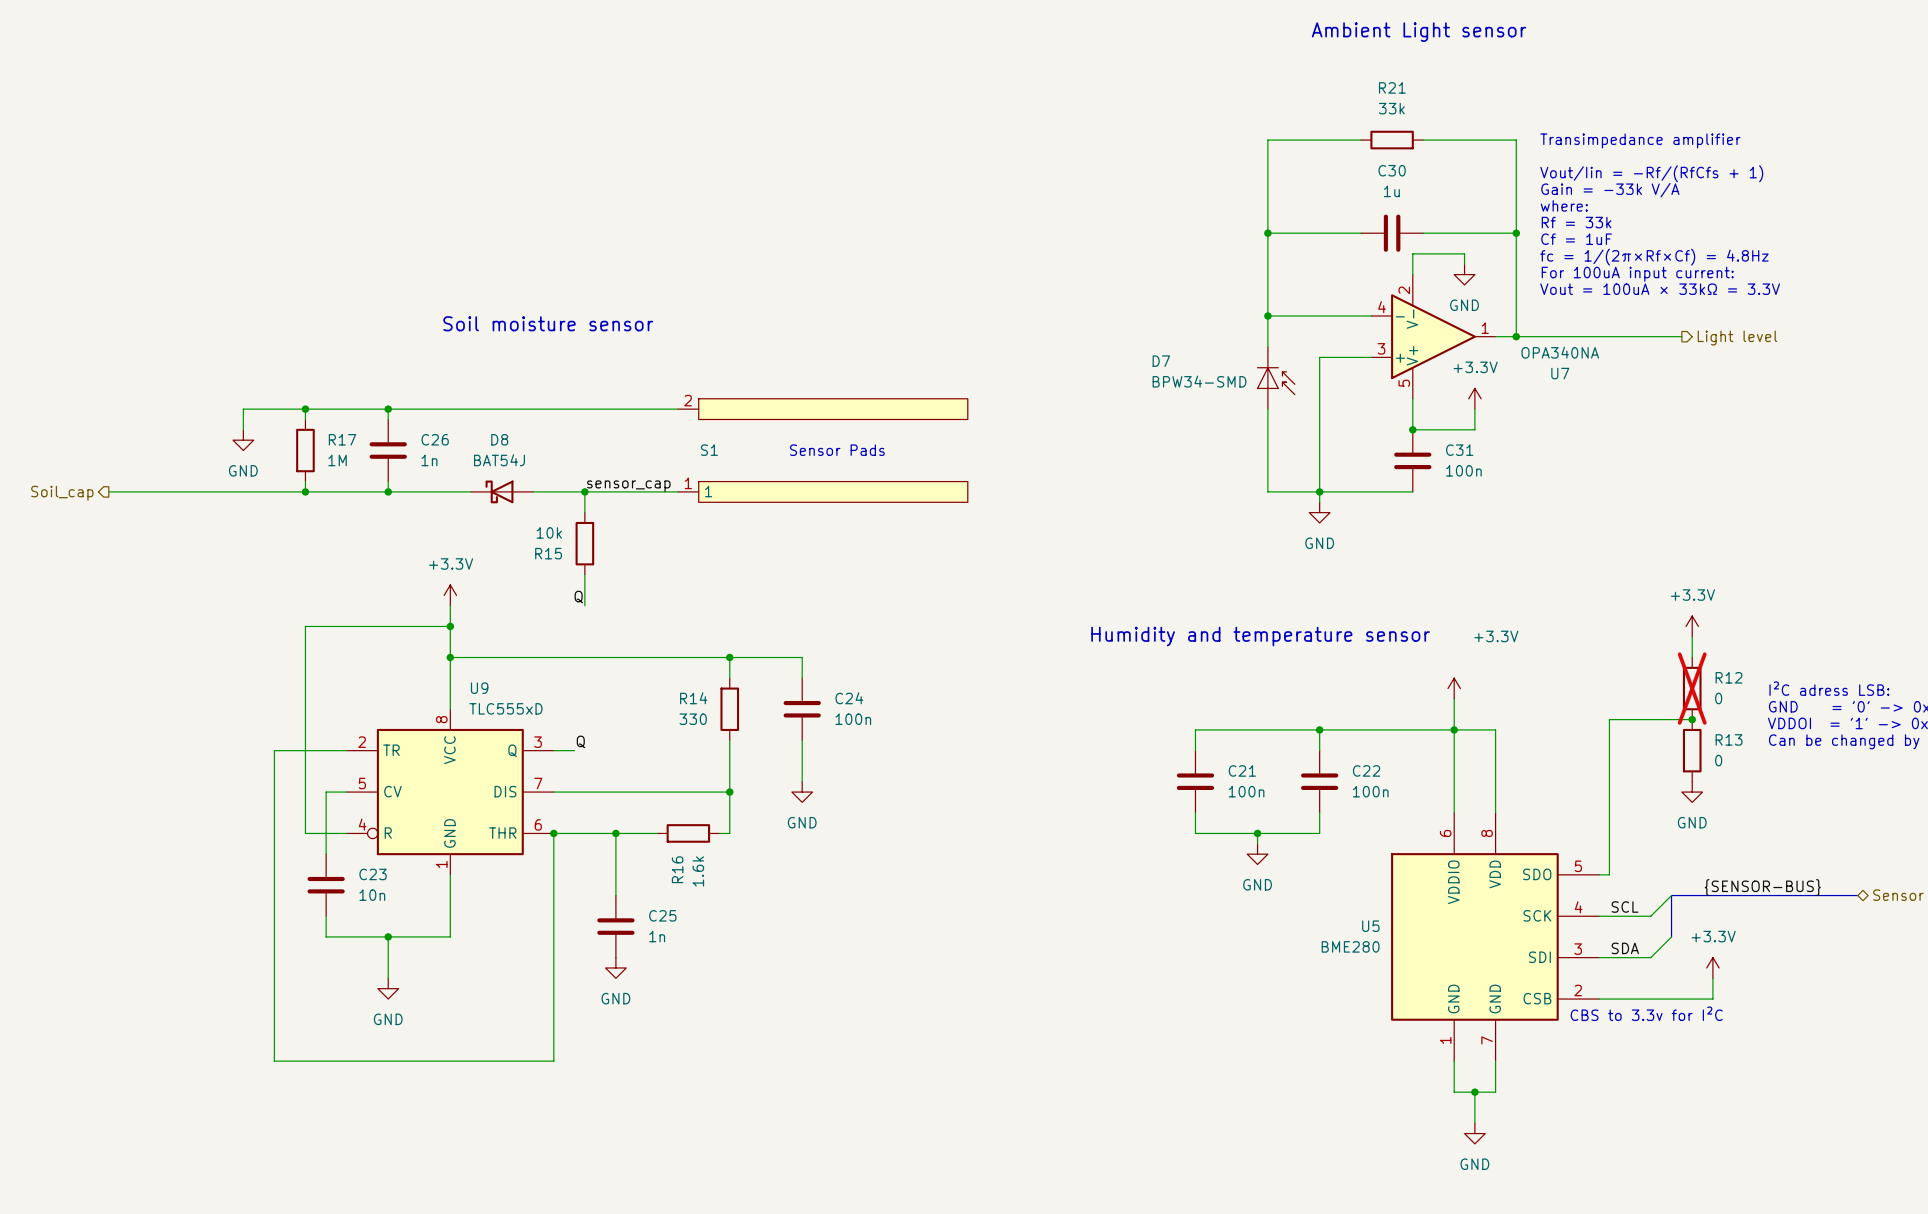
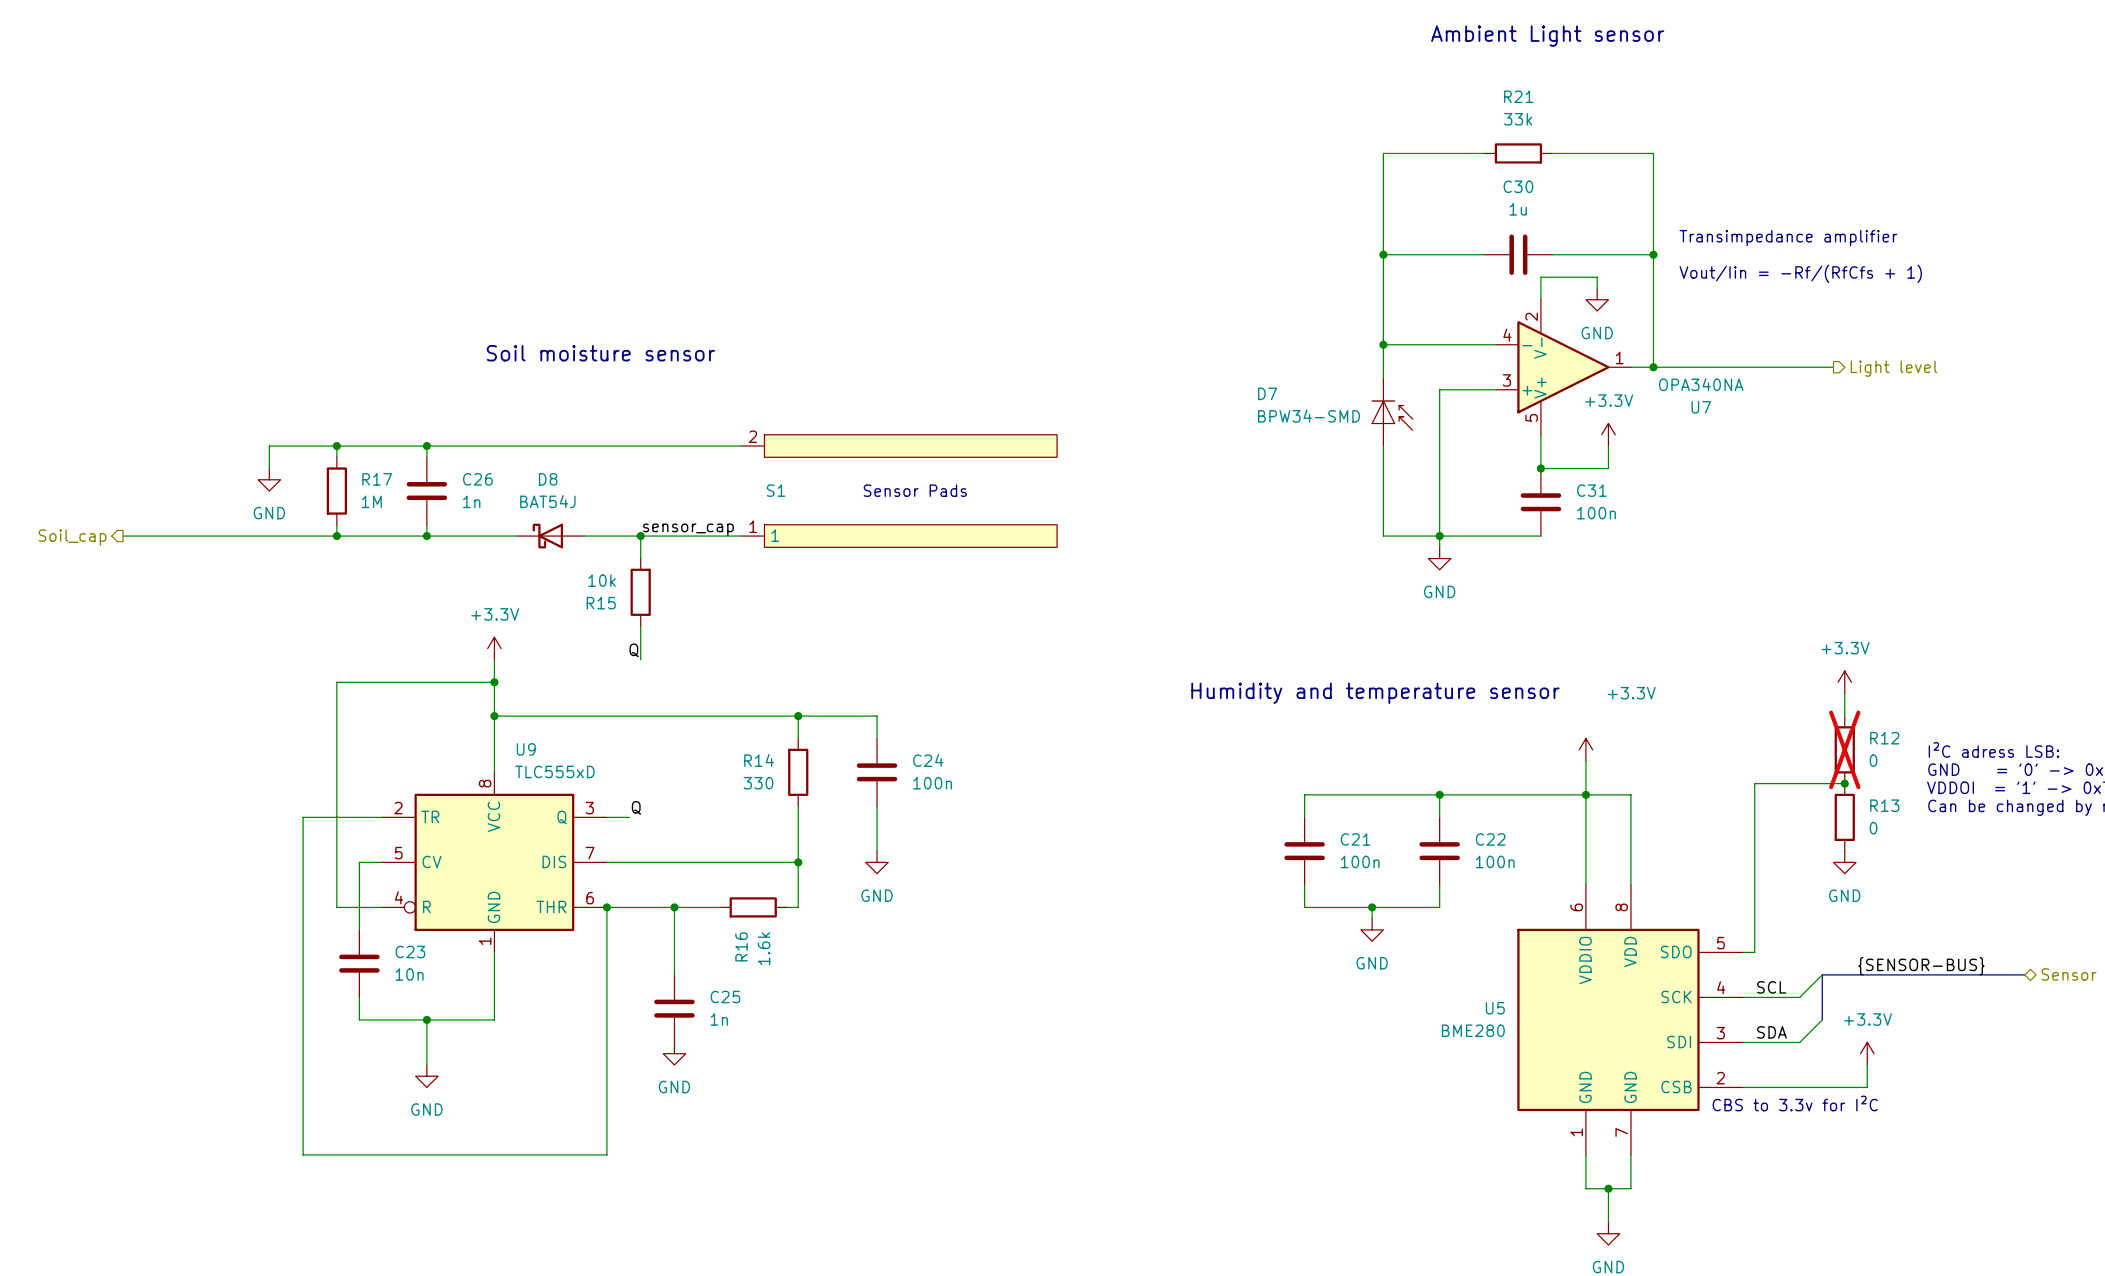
text position: Transimpedance amplifier (1640, 140) -> Transimpedance amplifier (1788, 238)
text position: Vout/Iin = -Rf/(RfCfs + 1) (1651, 173) -> Vout/Iin = -Rf/(RfCfs + 1) (1800, 273)
text: Gain = -33k V/A (1610, 190) -> none
text: where: (1564, 205) -> none
text: Rf = 33k (1576, 222) -> none
text: Cf = 1uF (1576, 239) -> none
text: fc = 1/(2π×Rf×Cf) = 4.8Hz (1654, 257) -> none
text: For 100uA input current: (1637, 274) -> none
text: Vout = 100uA × 33kΩ = 3.3V (1660, 289) -> none

